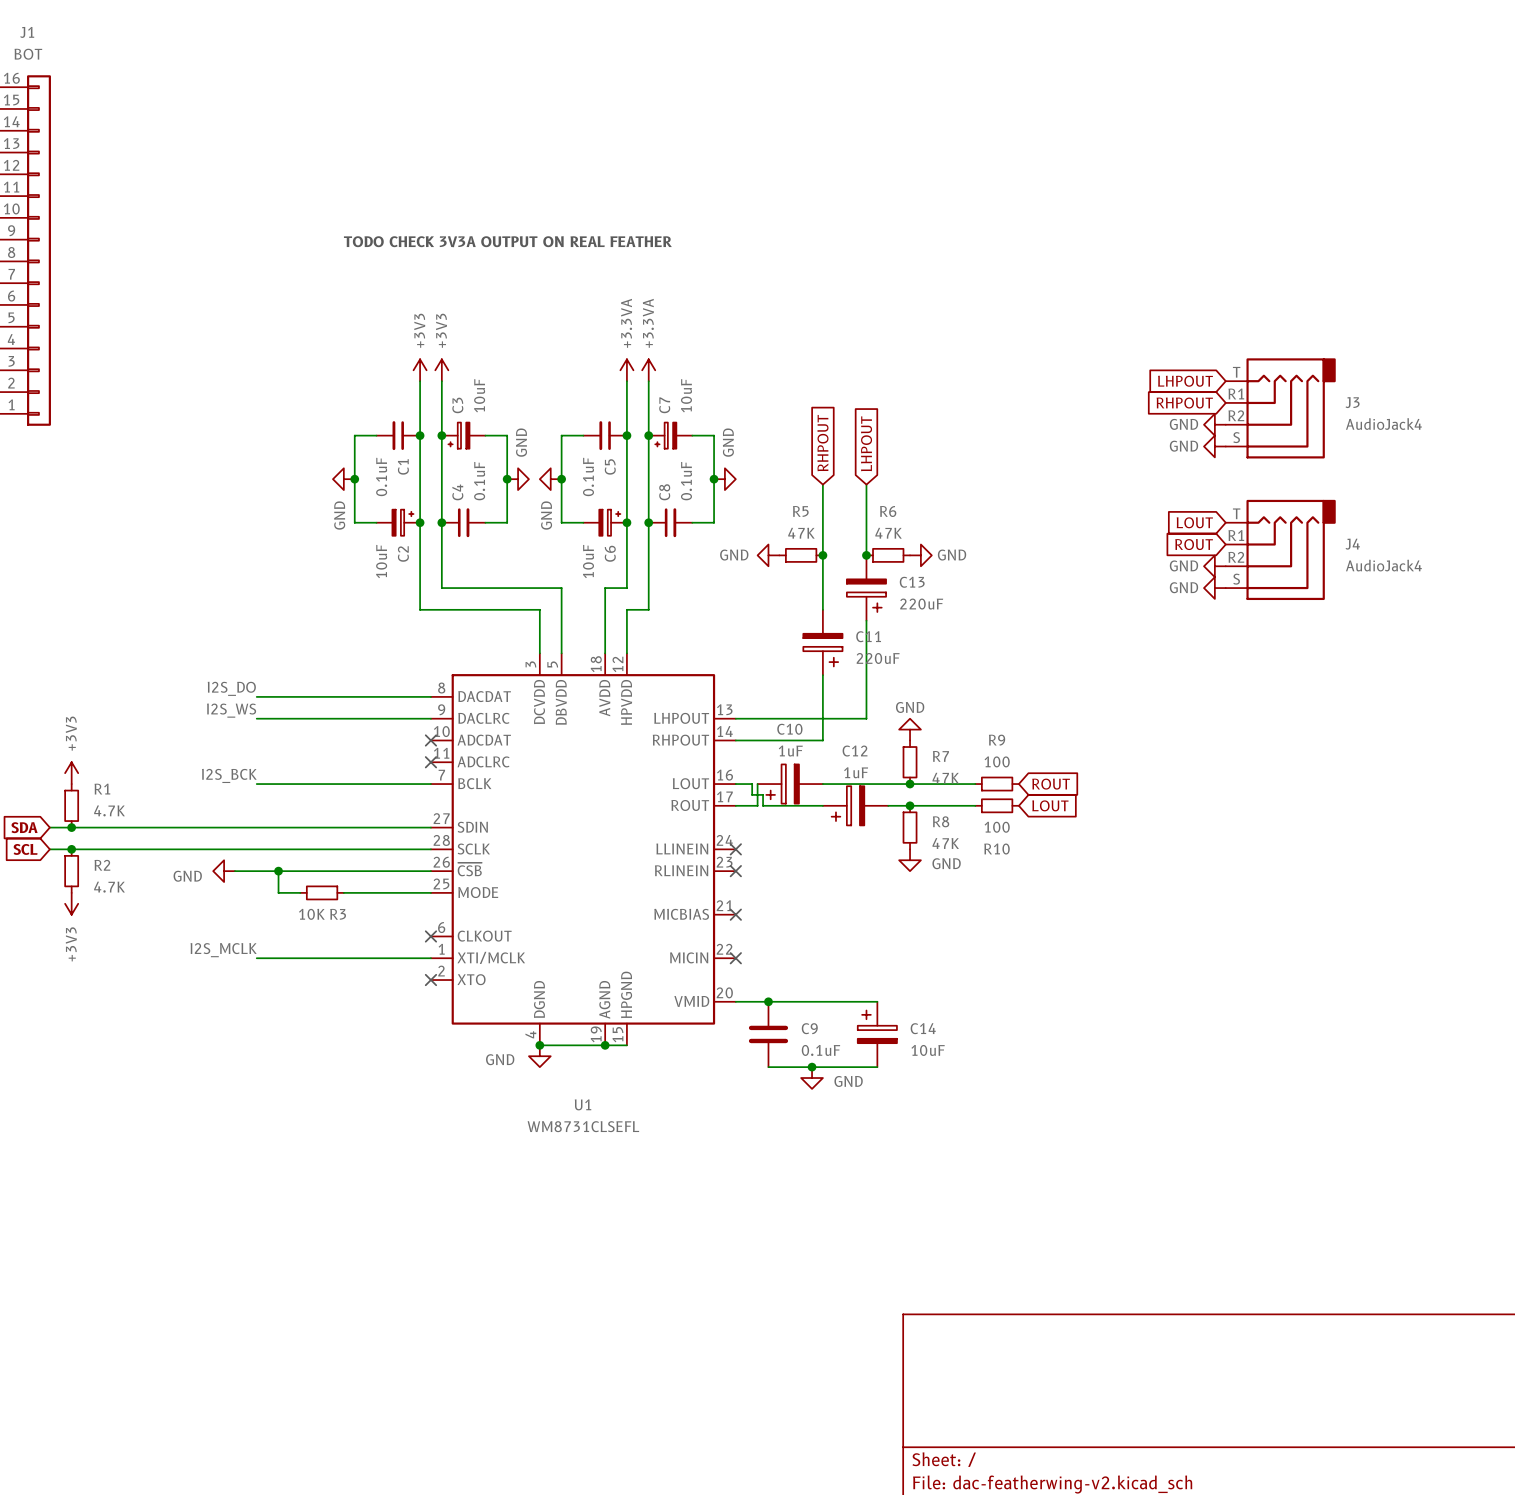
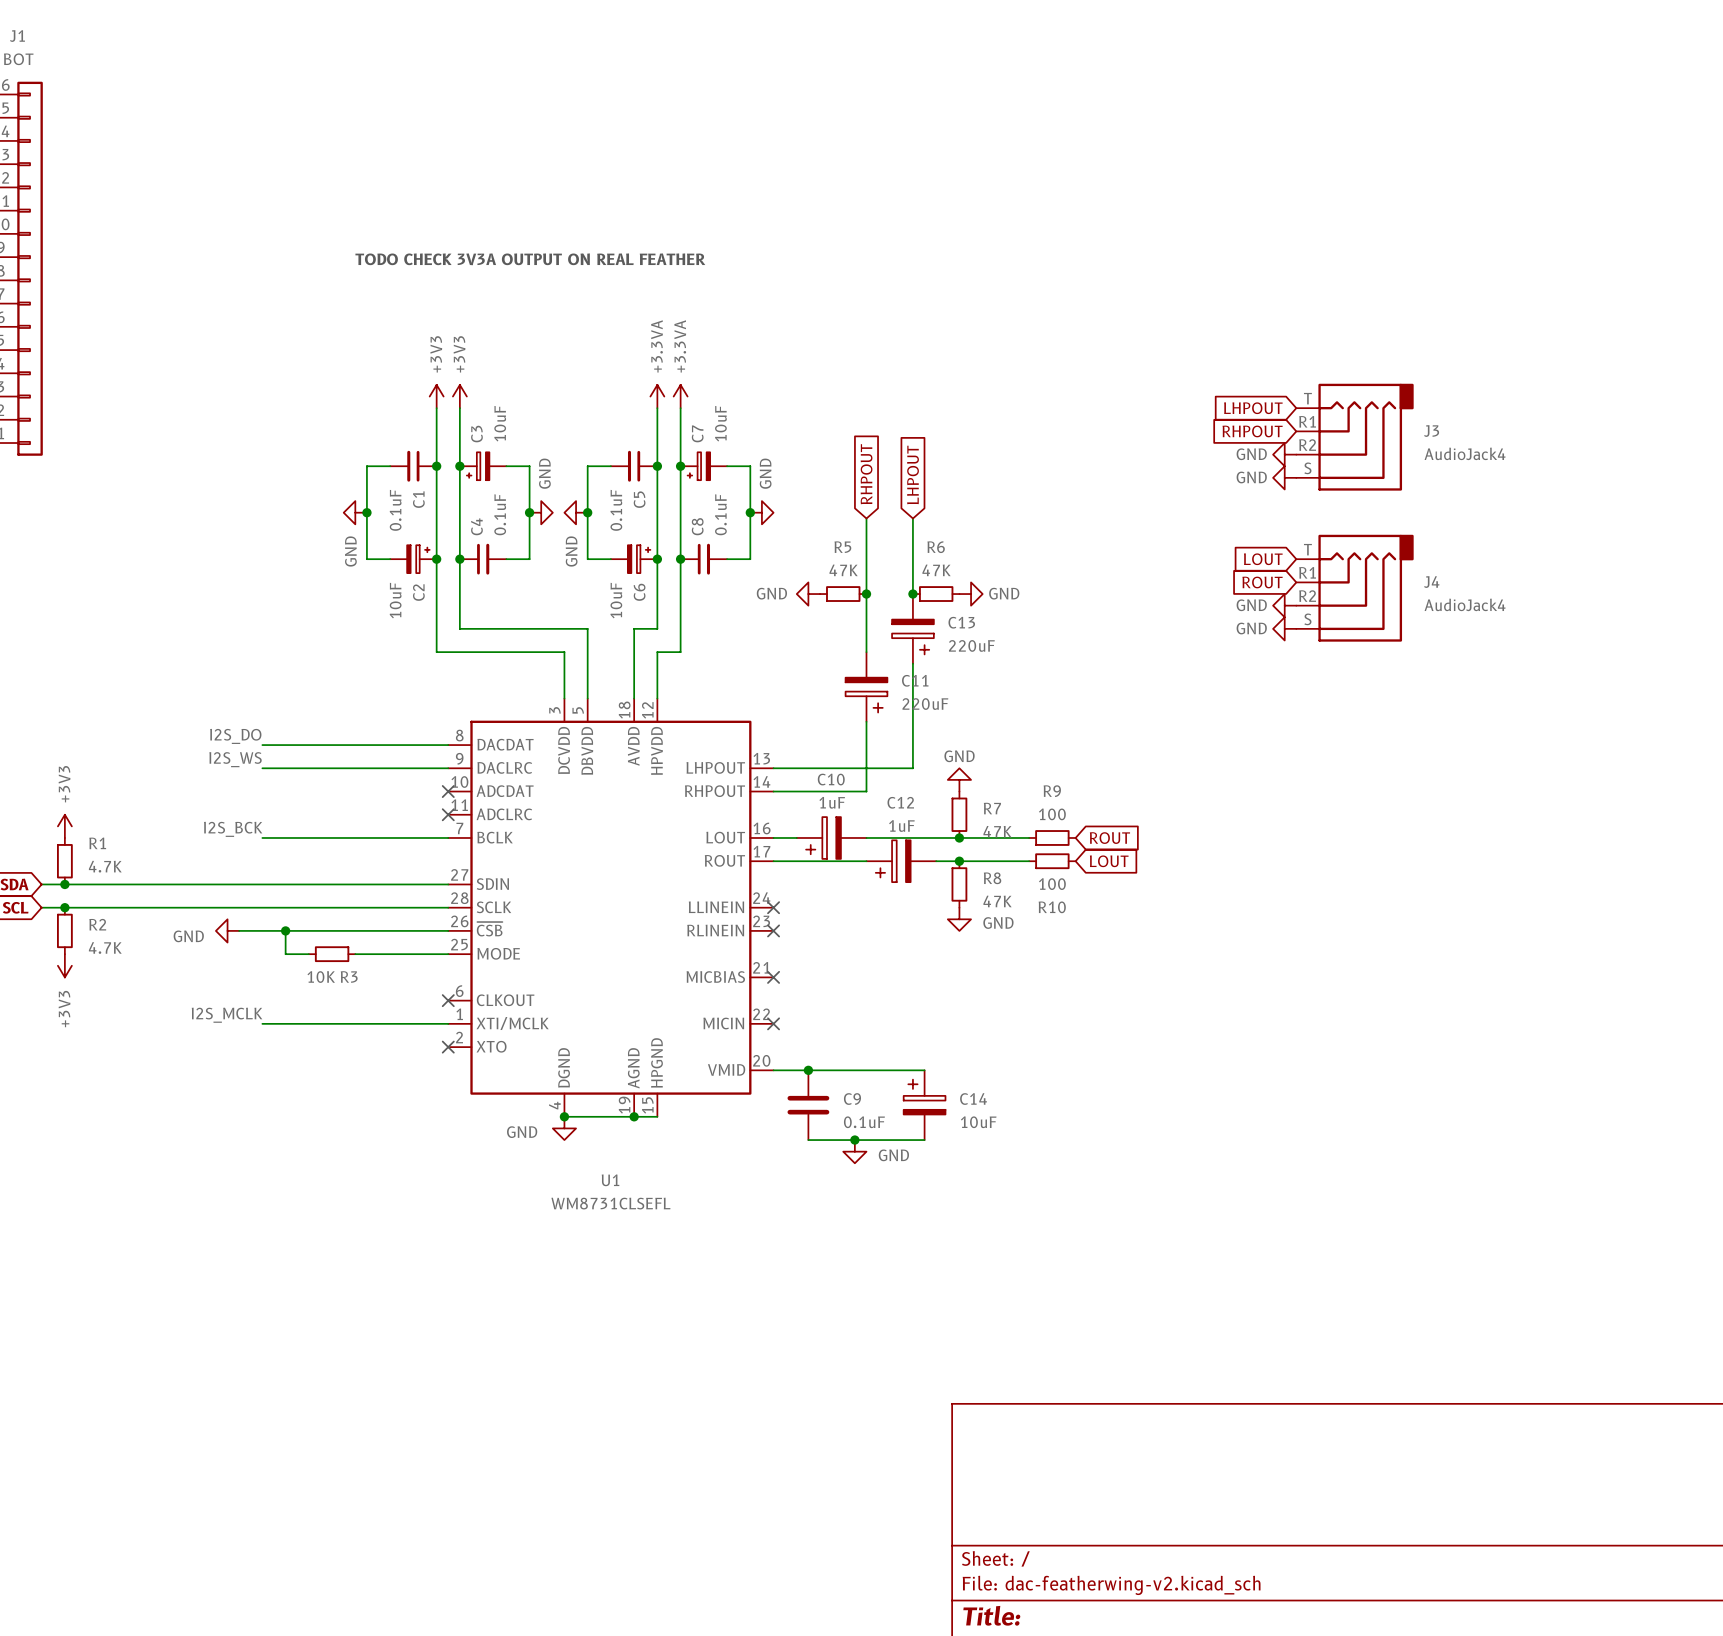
wire: (752, 784) (752, 794) (763, 794) (763, 805) -> (790, 837) (796, 837)
wire: (757, 784) (757, 805) -> (802, 861) (796, 861)

